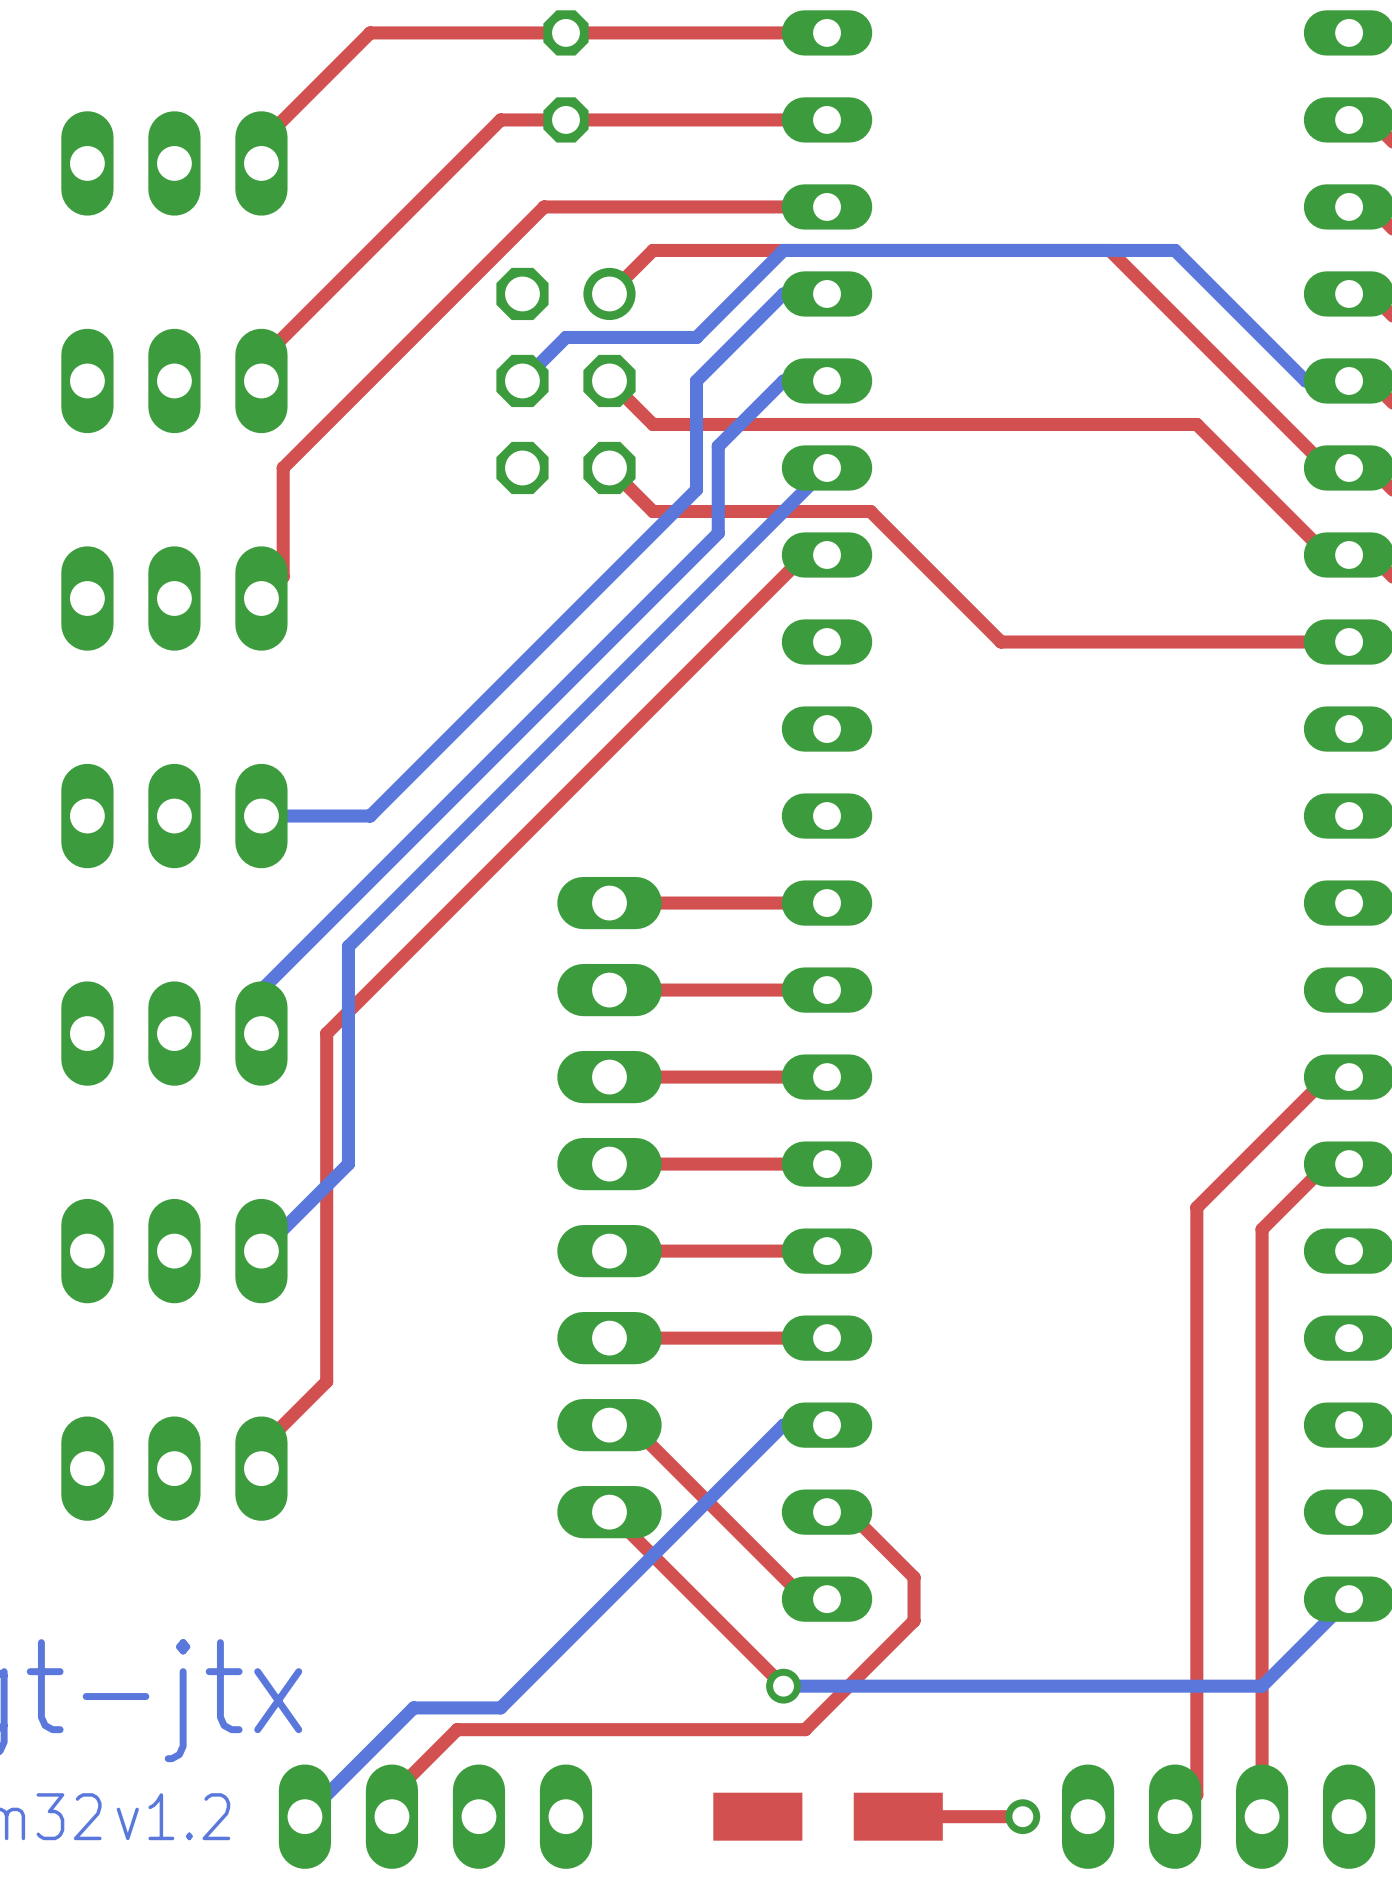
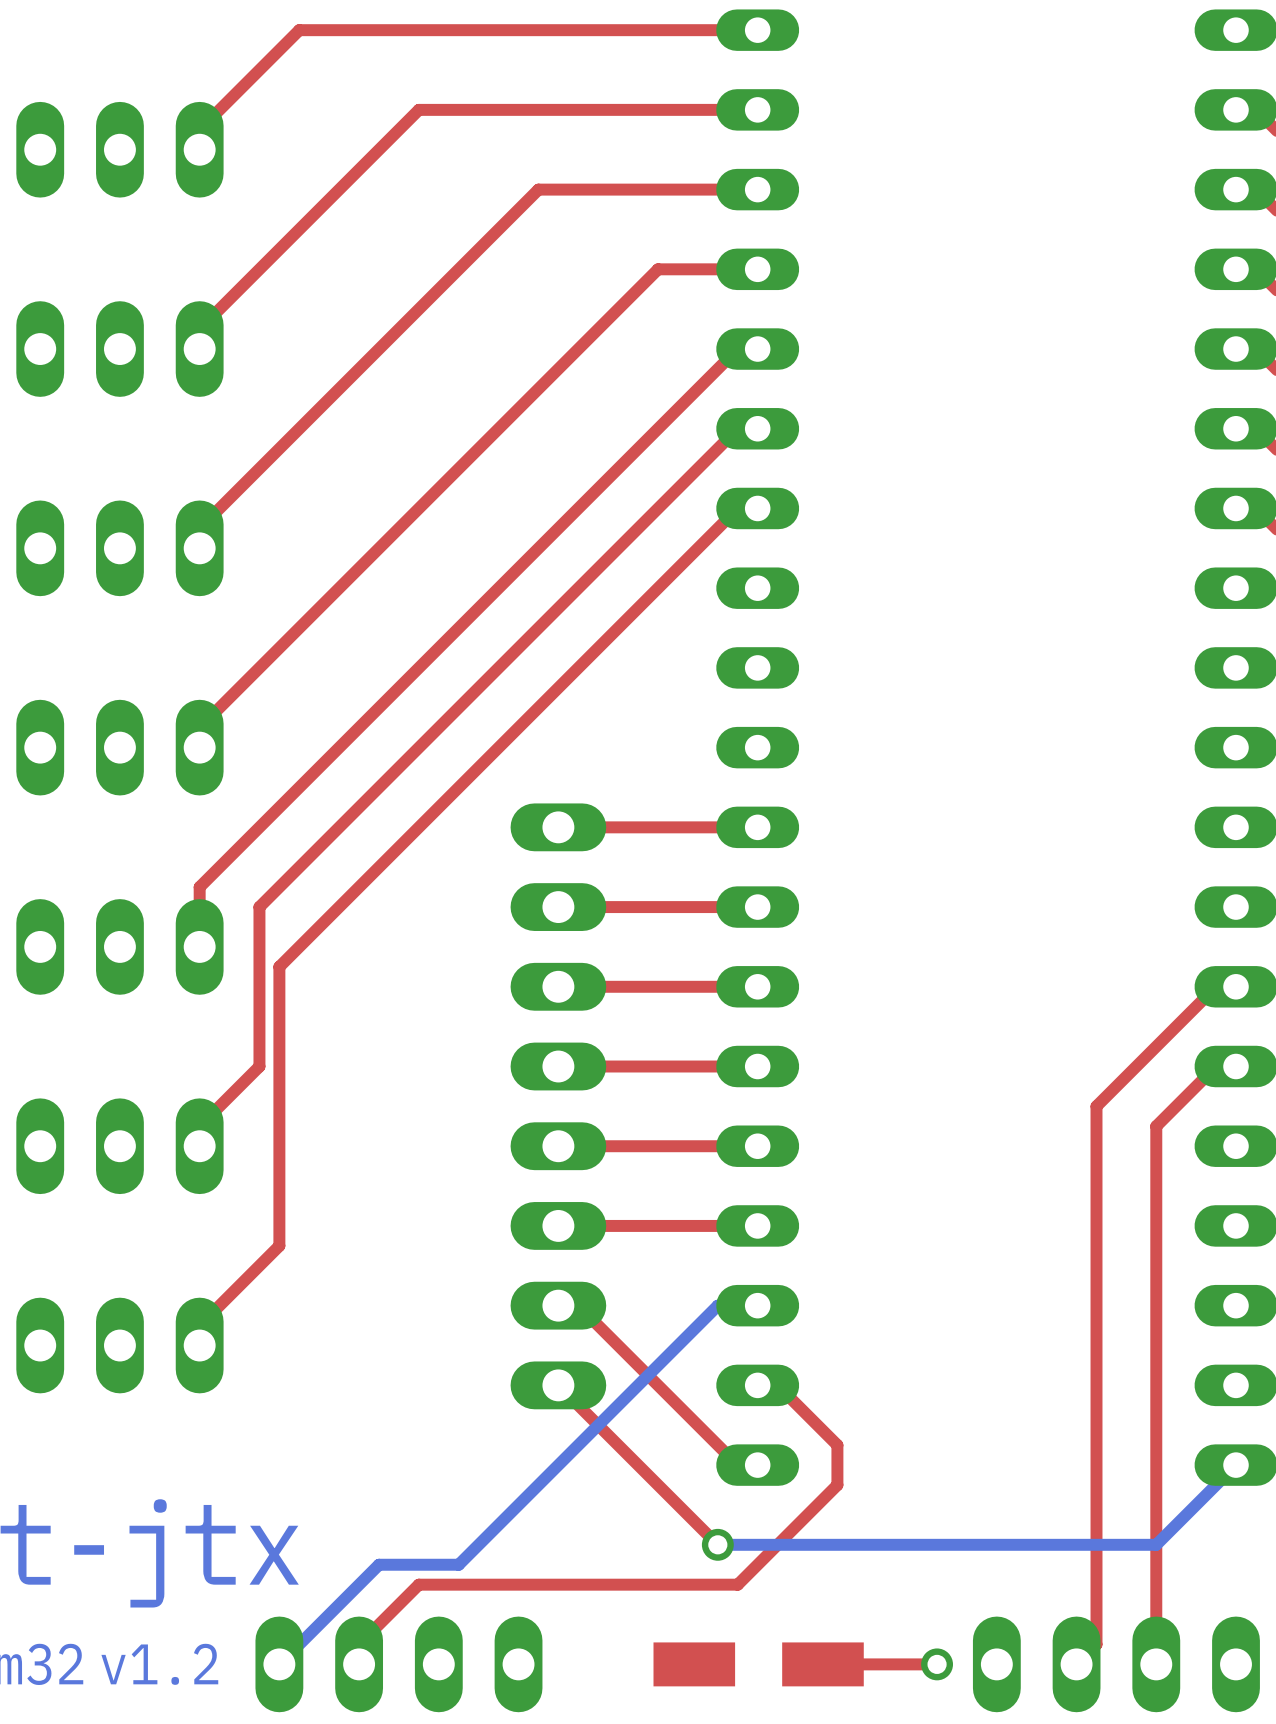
top track: (370, 32) (261, 141) (261, 163) -> (339, 30) (299, 30) (199, 129) (199, 149)
part: (565, 76) -> none
top track: (500, 119) (261, 359) (261, 380) -> (458, 109) (418, 109) (199, 329) (199, 349)
part position: (174, 163) -> (119, 149)
top track: (587, 206) (544, 206) (283, 467) (283, 576) (261, 598) -> (538, 189) (199, 528) (199, 548)
top track: (609, 293) (653, 250) (1109, 250) (1327, 467) (1349, 467) -> none
top track: none -> (757, 269) (658, 269) (199, 727) (199, 747)
bottom track: (827, 293) (783, 293) (696, 380) (696, 489) (370, 816) (261, 816) -> none
part position: (174, 380) -> (119, 349)
part: (565, 380) -> none
top track: (609, 380) (653, 424) (1196, 424) (1327, 555) (1349, 555) -> none
top track: none -> (757, 349) (737, 349) (199, 887) (199, 946)
bottom track: (827, 380) (783, 380) (718, 446) (718, 533) (261, 990) (261, 1033) -> none
bottom track: (1349, 380) (1305, 380) (1175, 250) (783, 250) (696, 337) (565, 337) (522, 380) -> none
top track: (609, 467) (653, 511) (870, 511) (1001, 642) (1349, 642) -> none
top track: none -> (757, 428) (737, 428) (259, 907) (259, 1066) (199, 1126) (199, 1146)
bottom track: (827, 467) (348, 946) (348, 1164) (261, 1251) -> none
part position: (174, 598) -> (119, 548)
part position: (174, 816) -> (119, 747)
part position: (174, 1033) -> (119, 946)
top track: (326, 1033) (326, 1381) (261, 1446) (261, 1468) -> (299, 946) (279, 966) (279, 1245) (199, 1325) (199, 1345)
part position: (174, 1251) -> (119, 1146)
part position: (174, 1468) -> (119, 1345)

